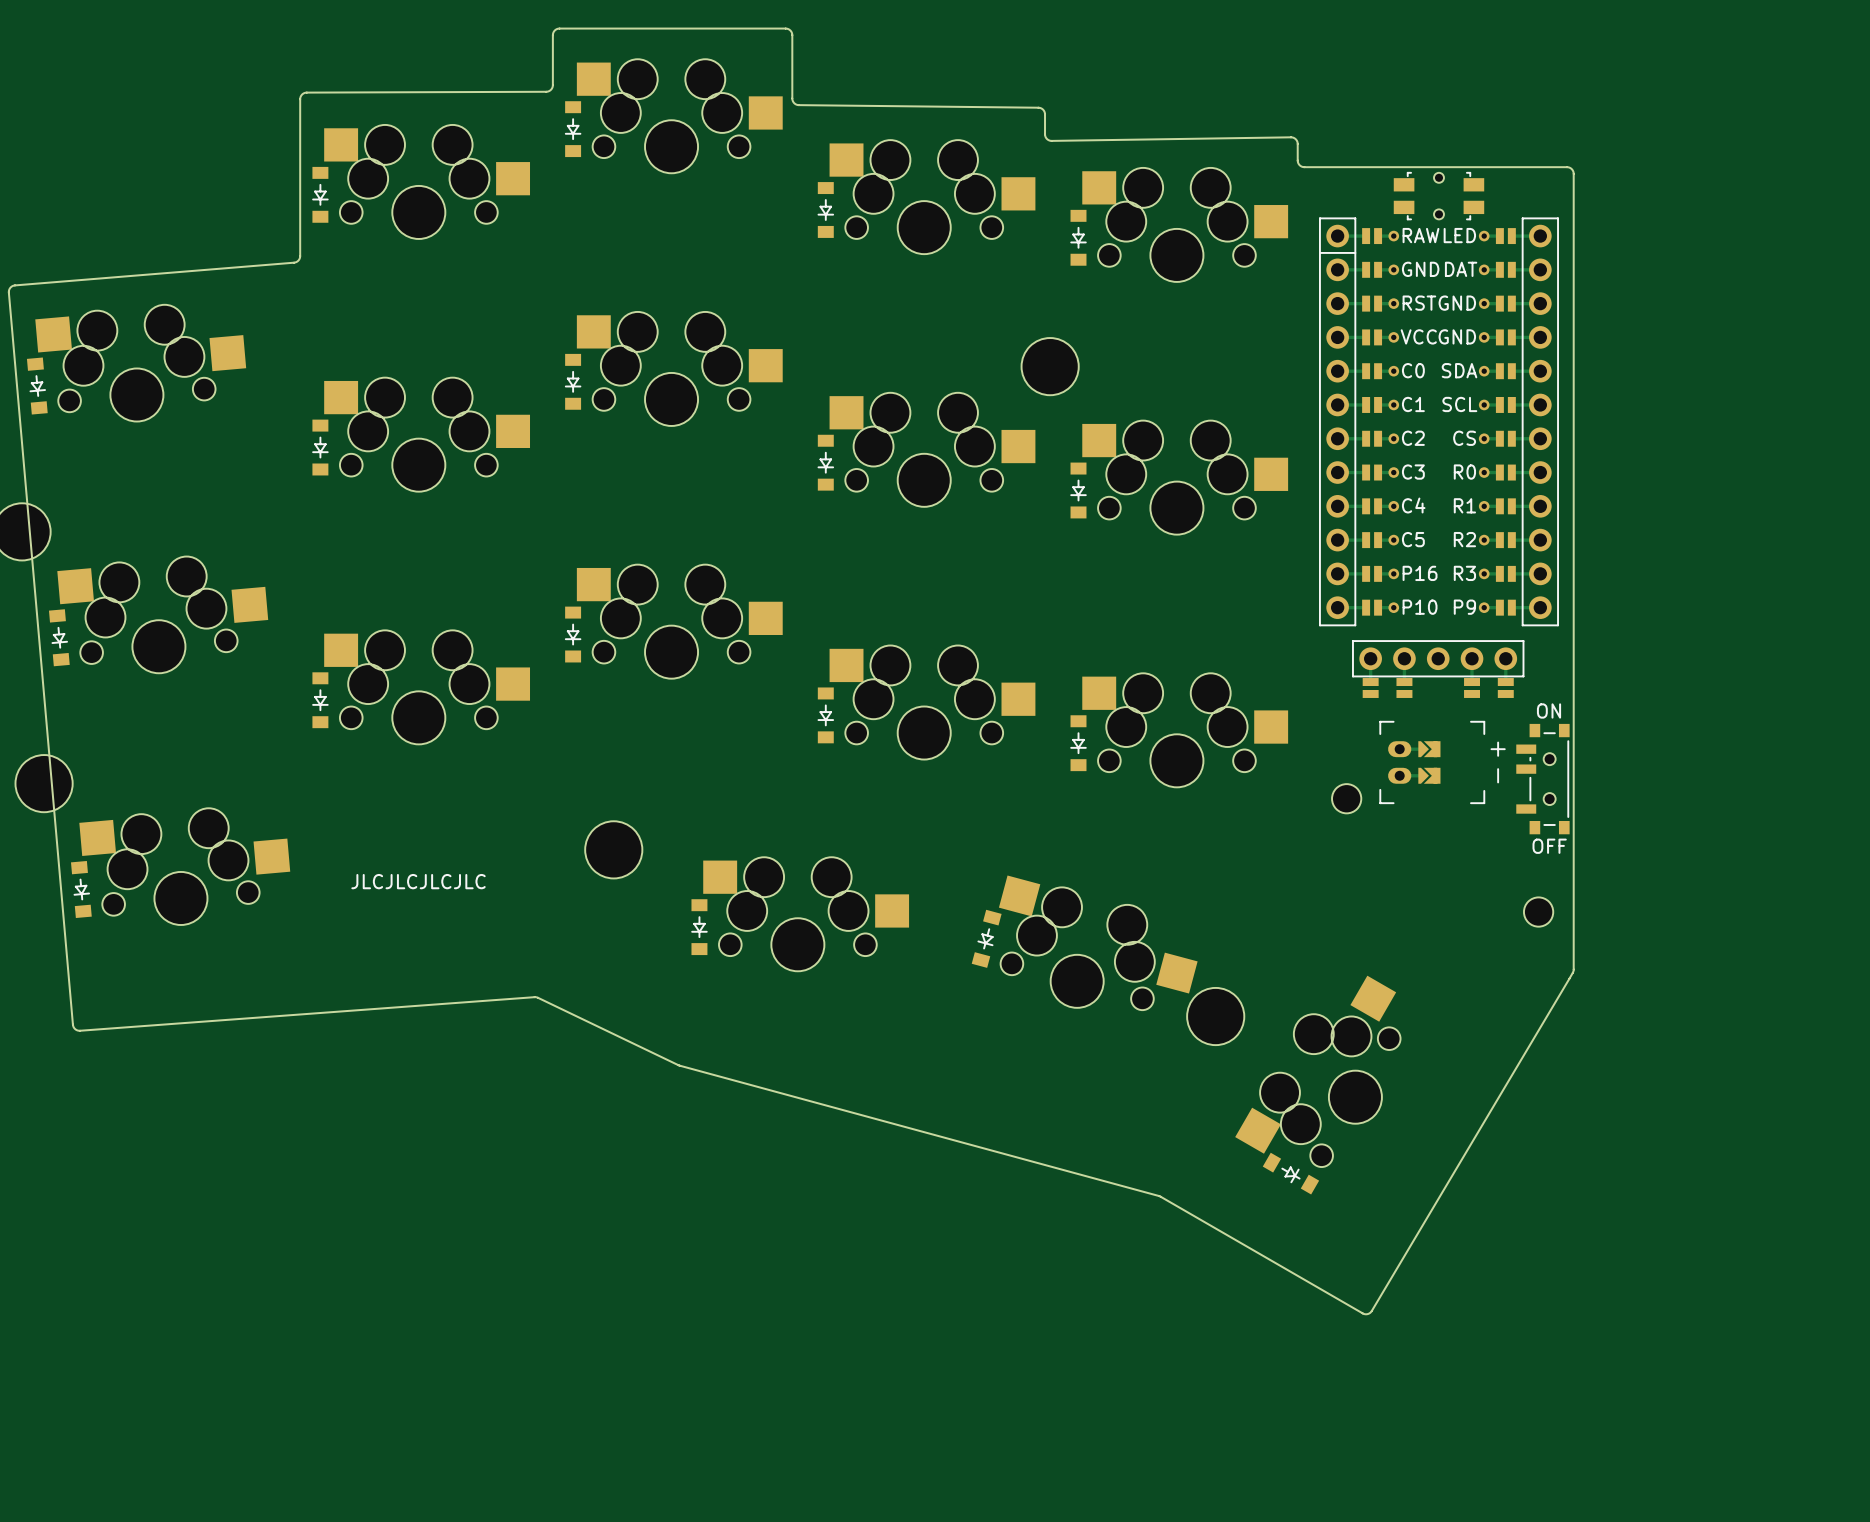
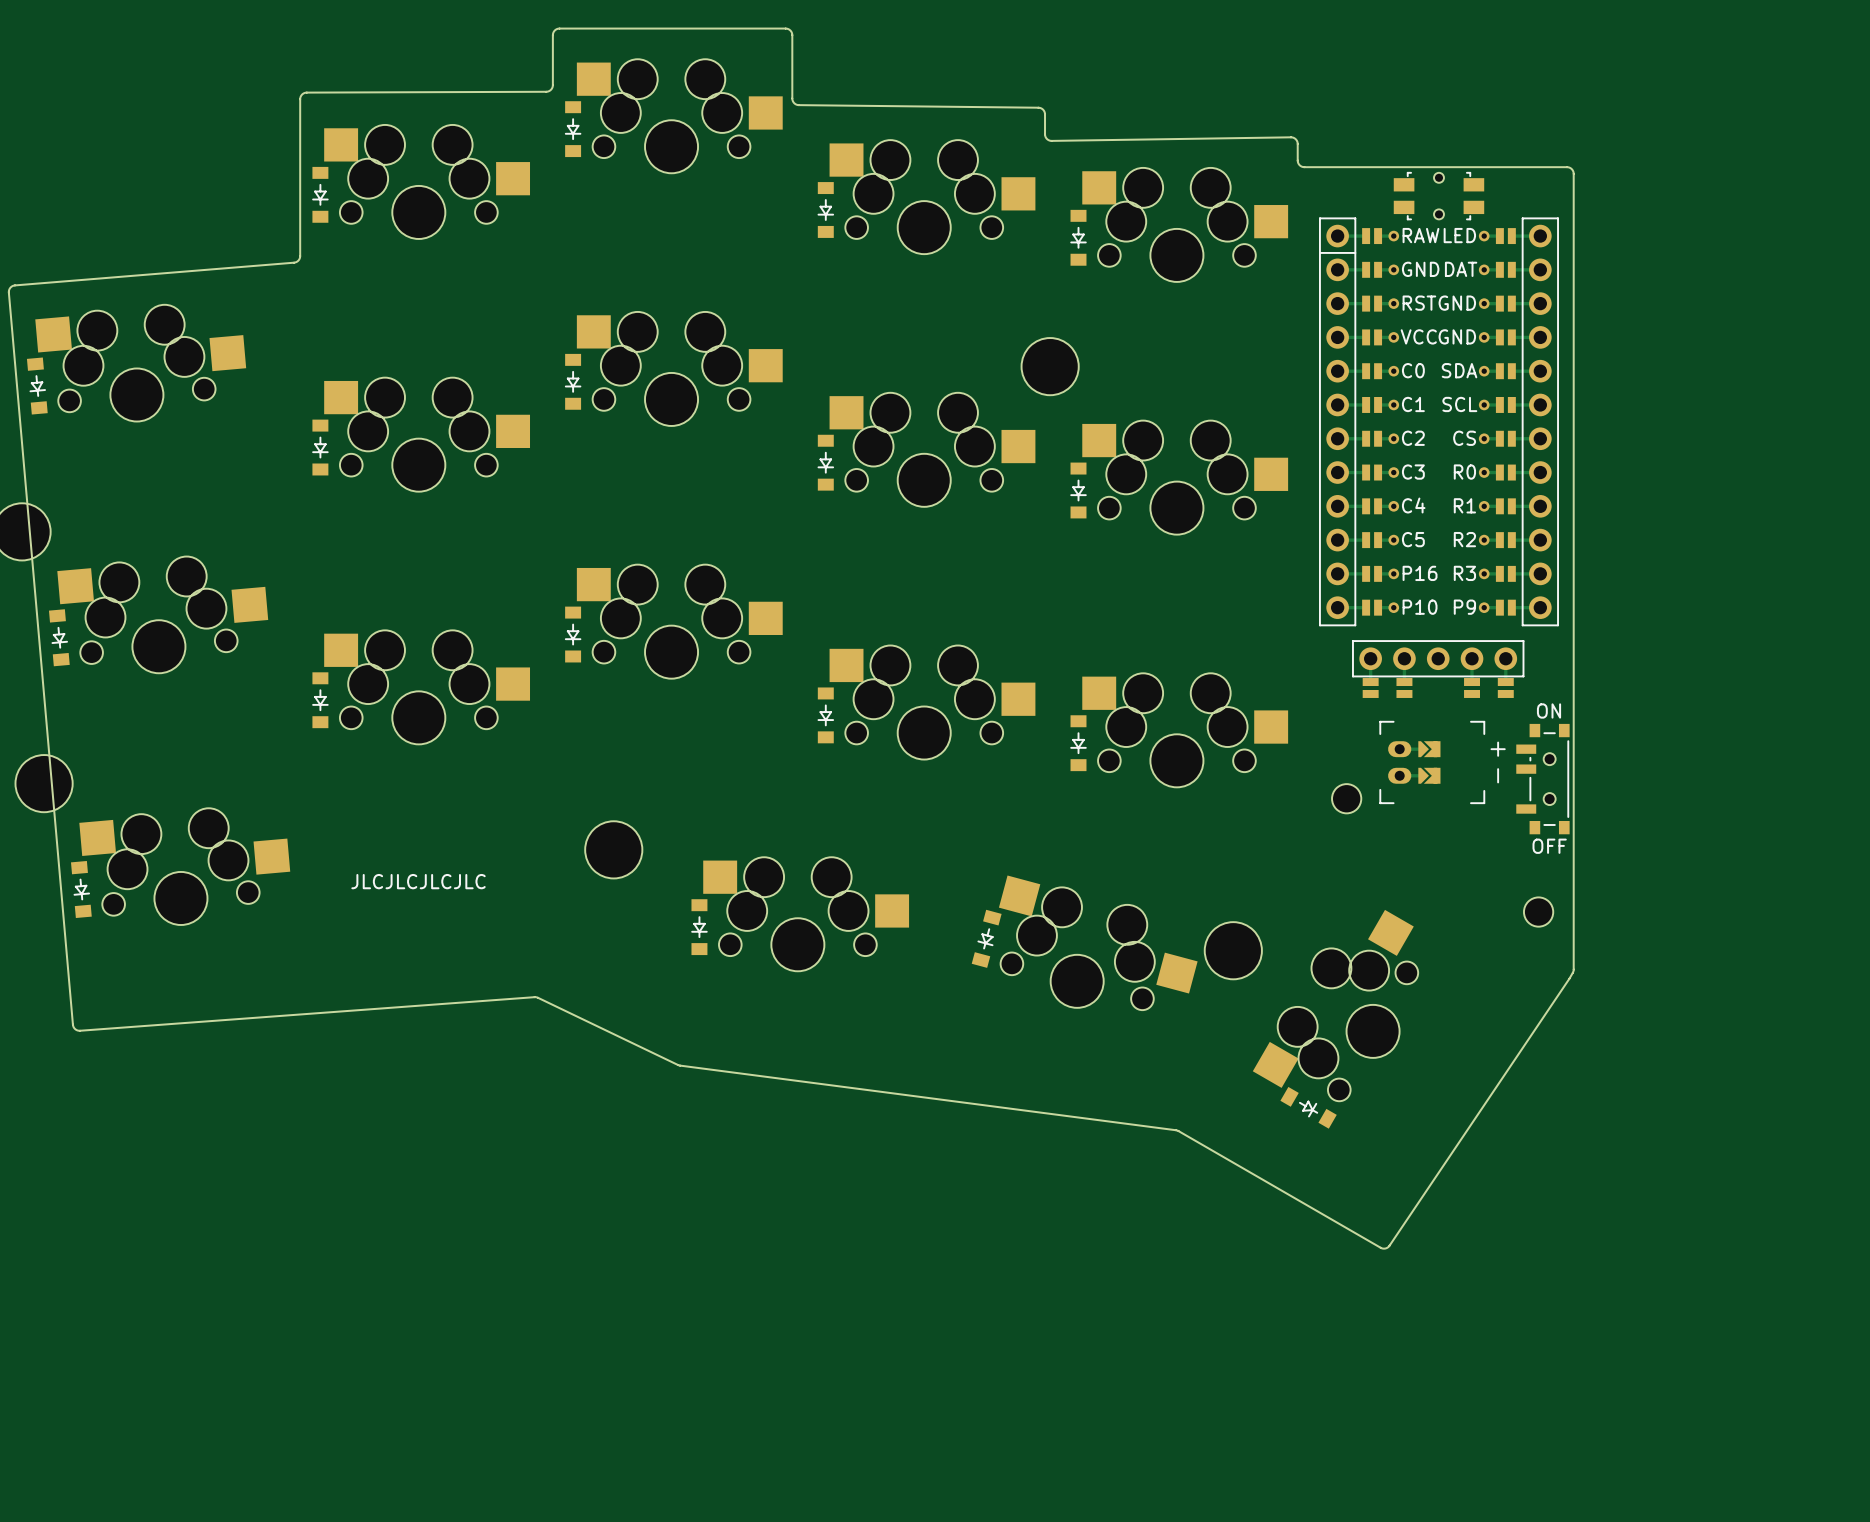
board edge: (1569, 978) (1371, 1311) (1366, 1314) (1159, 1196) (678, 1064) -> (1569, 978) (1389, 1245) (1384, 1248) (1176, 1130) (678, 1064)
part position: (1215, 1016) -> (1233, 950)
part position: (1317, 1071) -> (1335, 1005)
part position: (1290, 1173) -> (1308, 1107)

